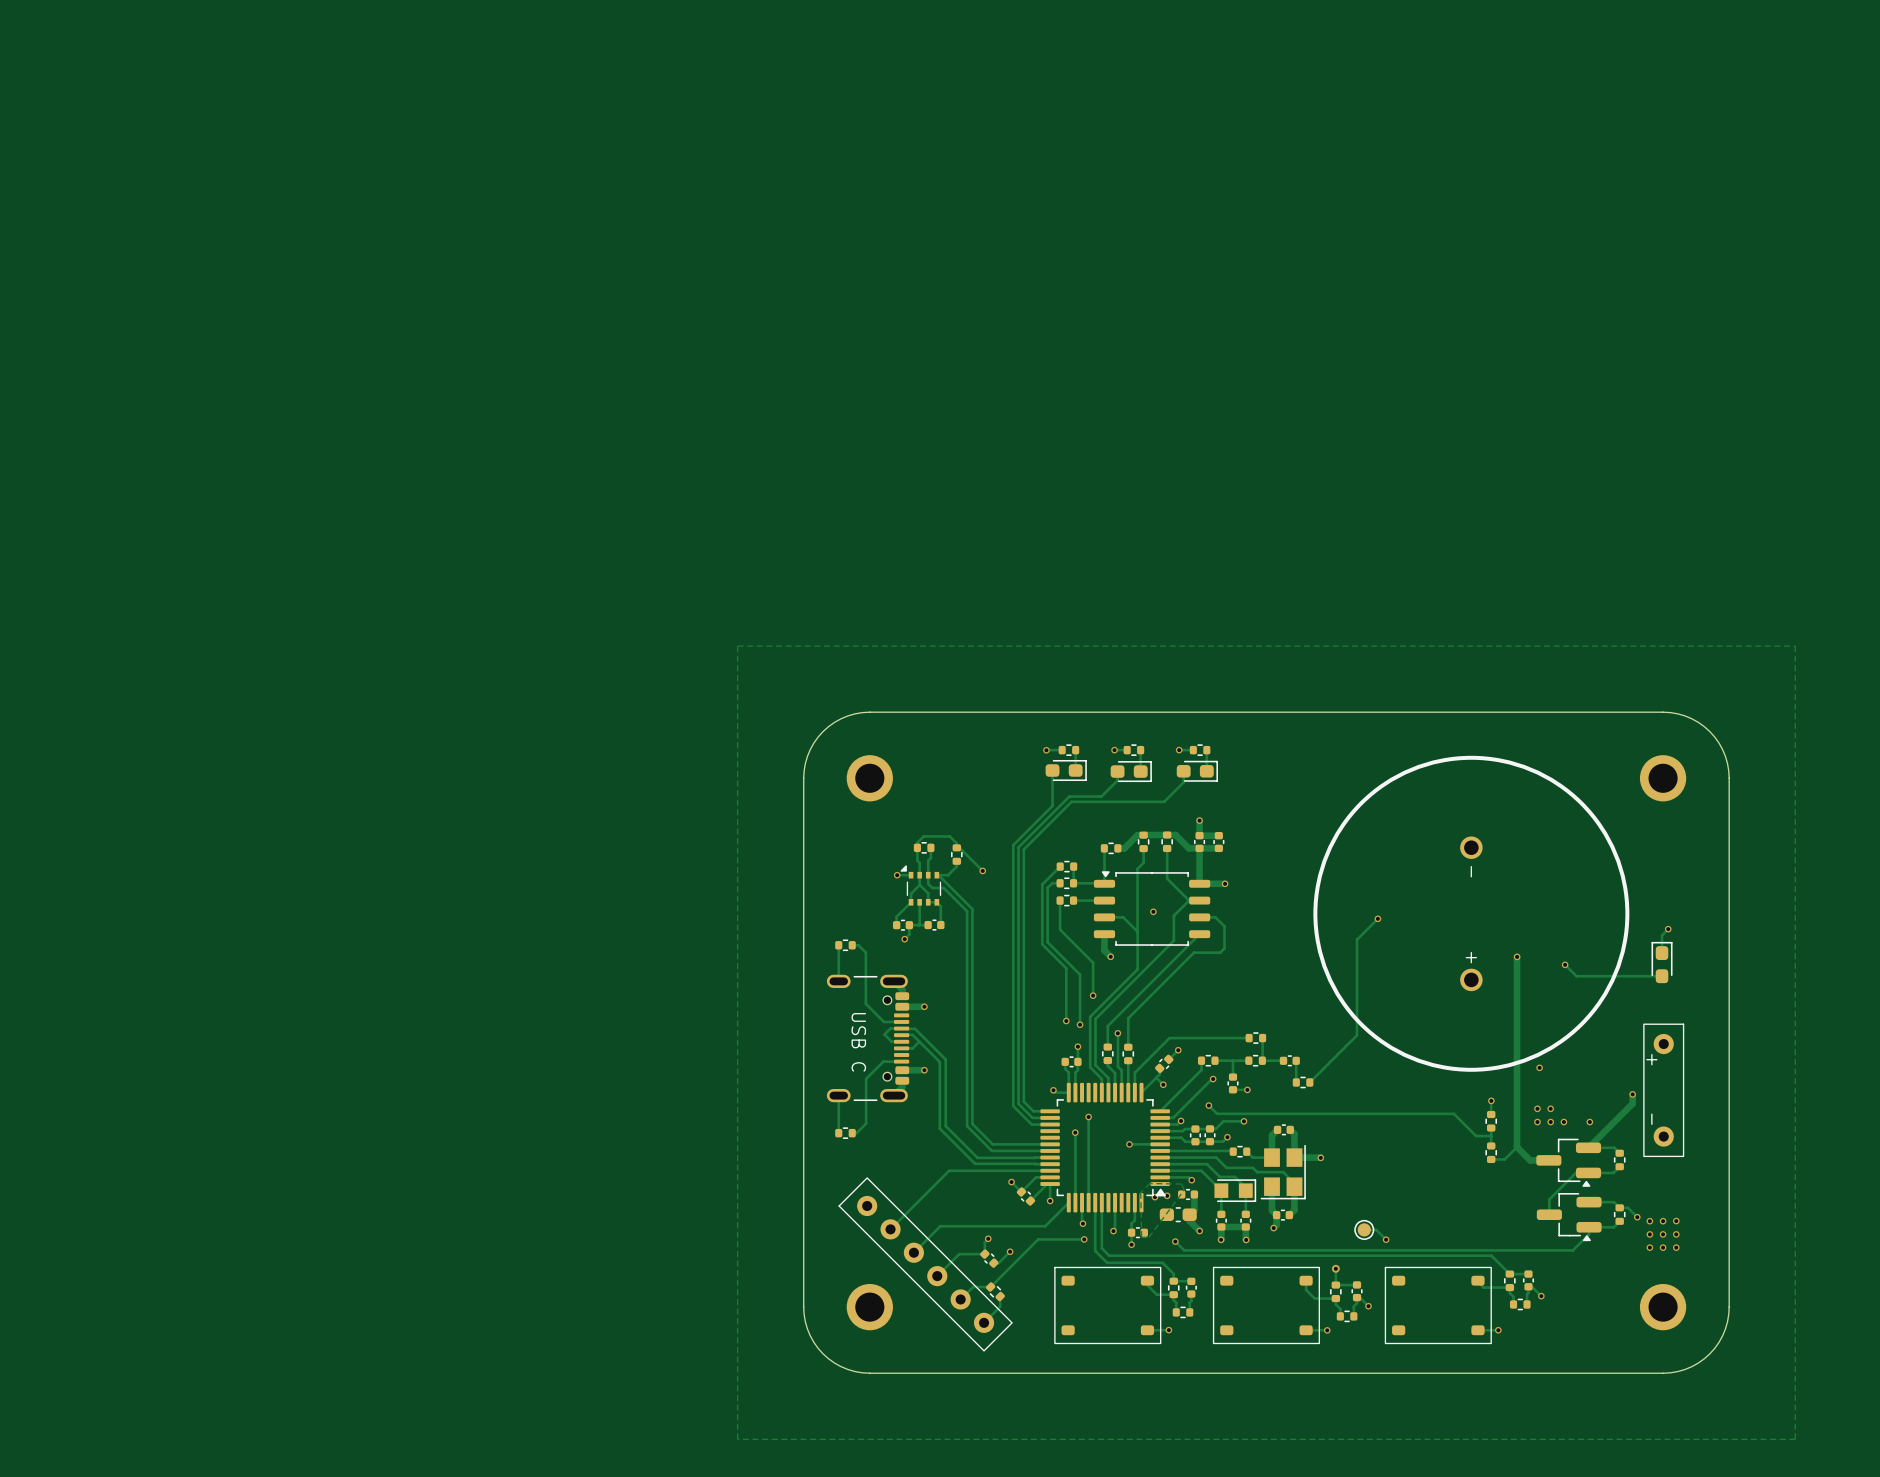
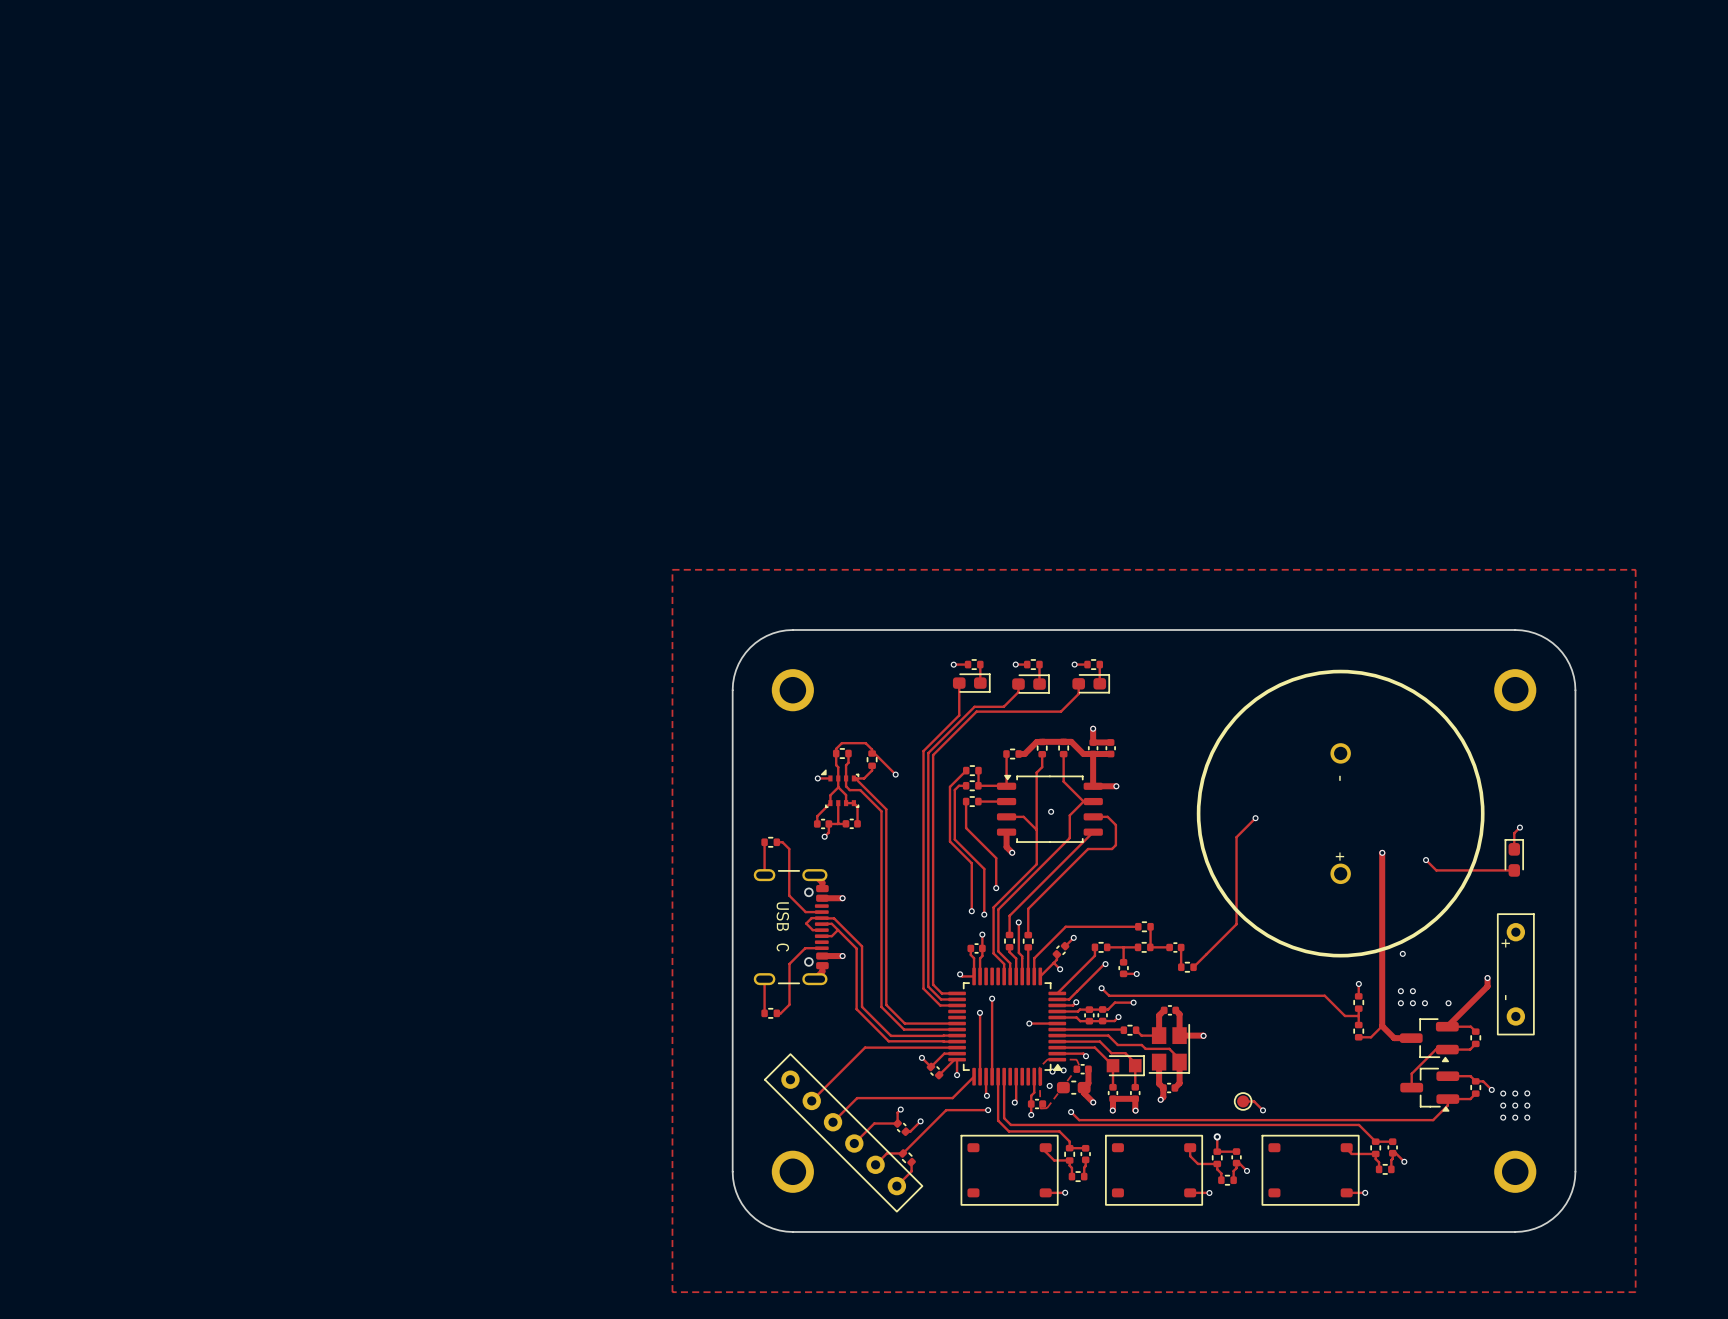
part footprint: [900, 865, 942, 906] -> [820, 769, 860, 808]
via: none -> (1049, 1085)

